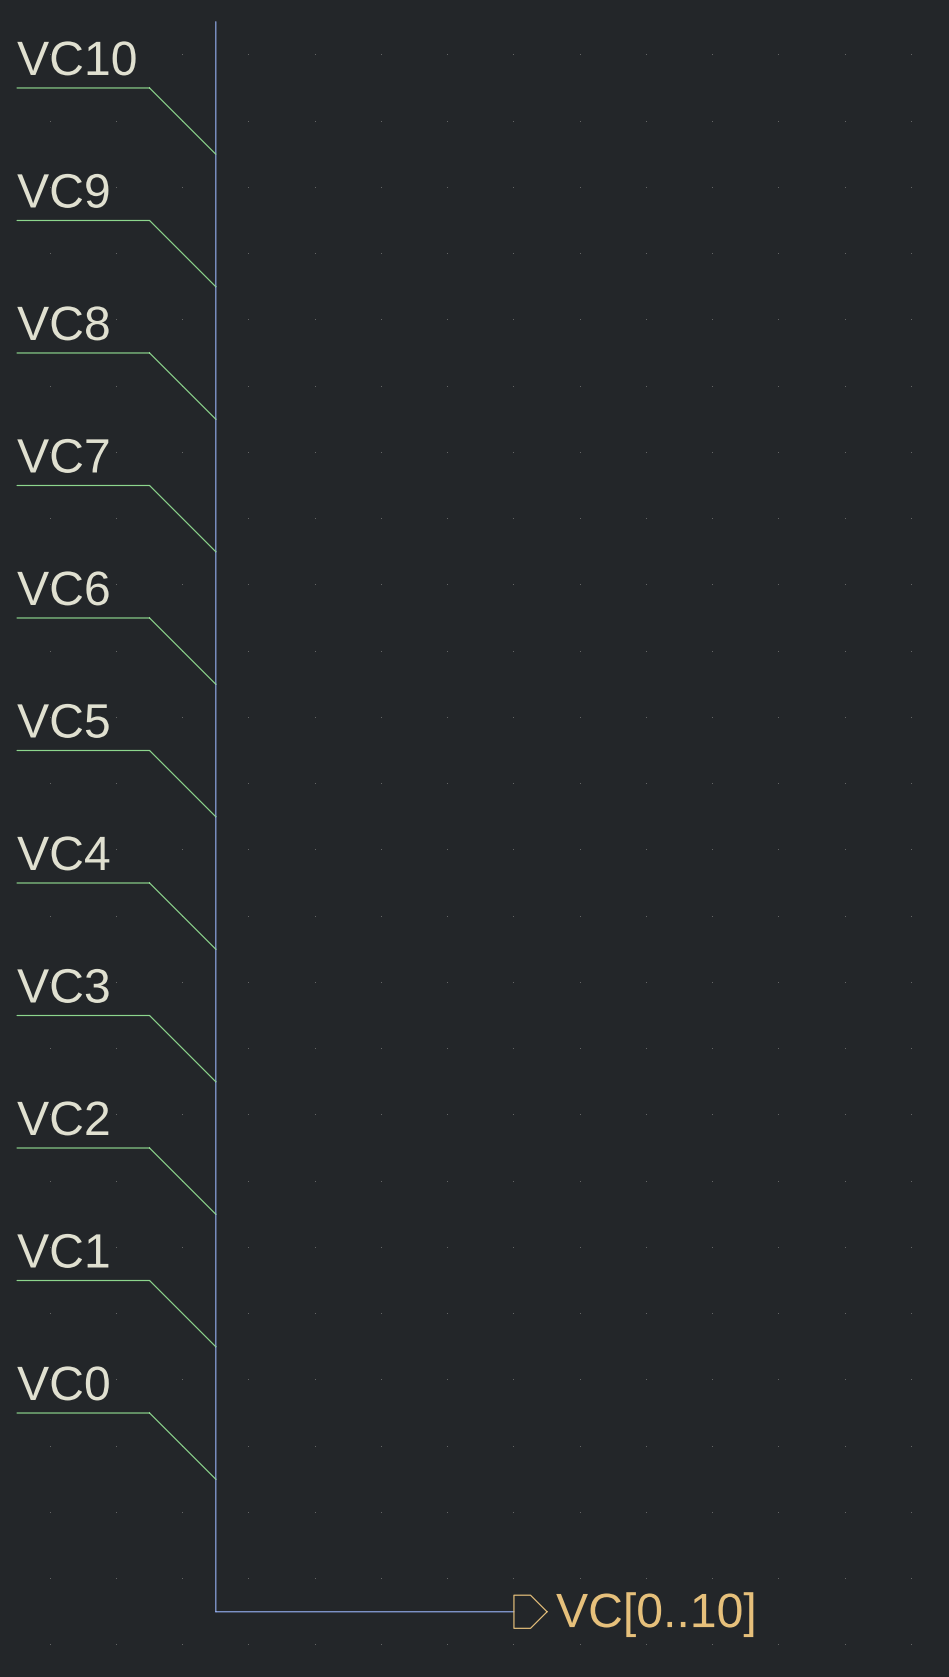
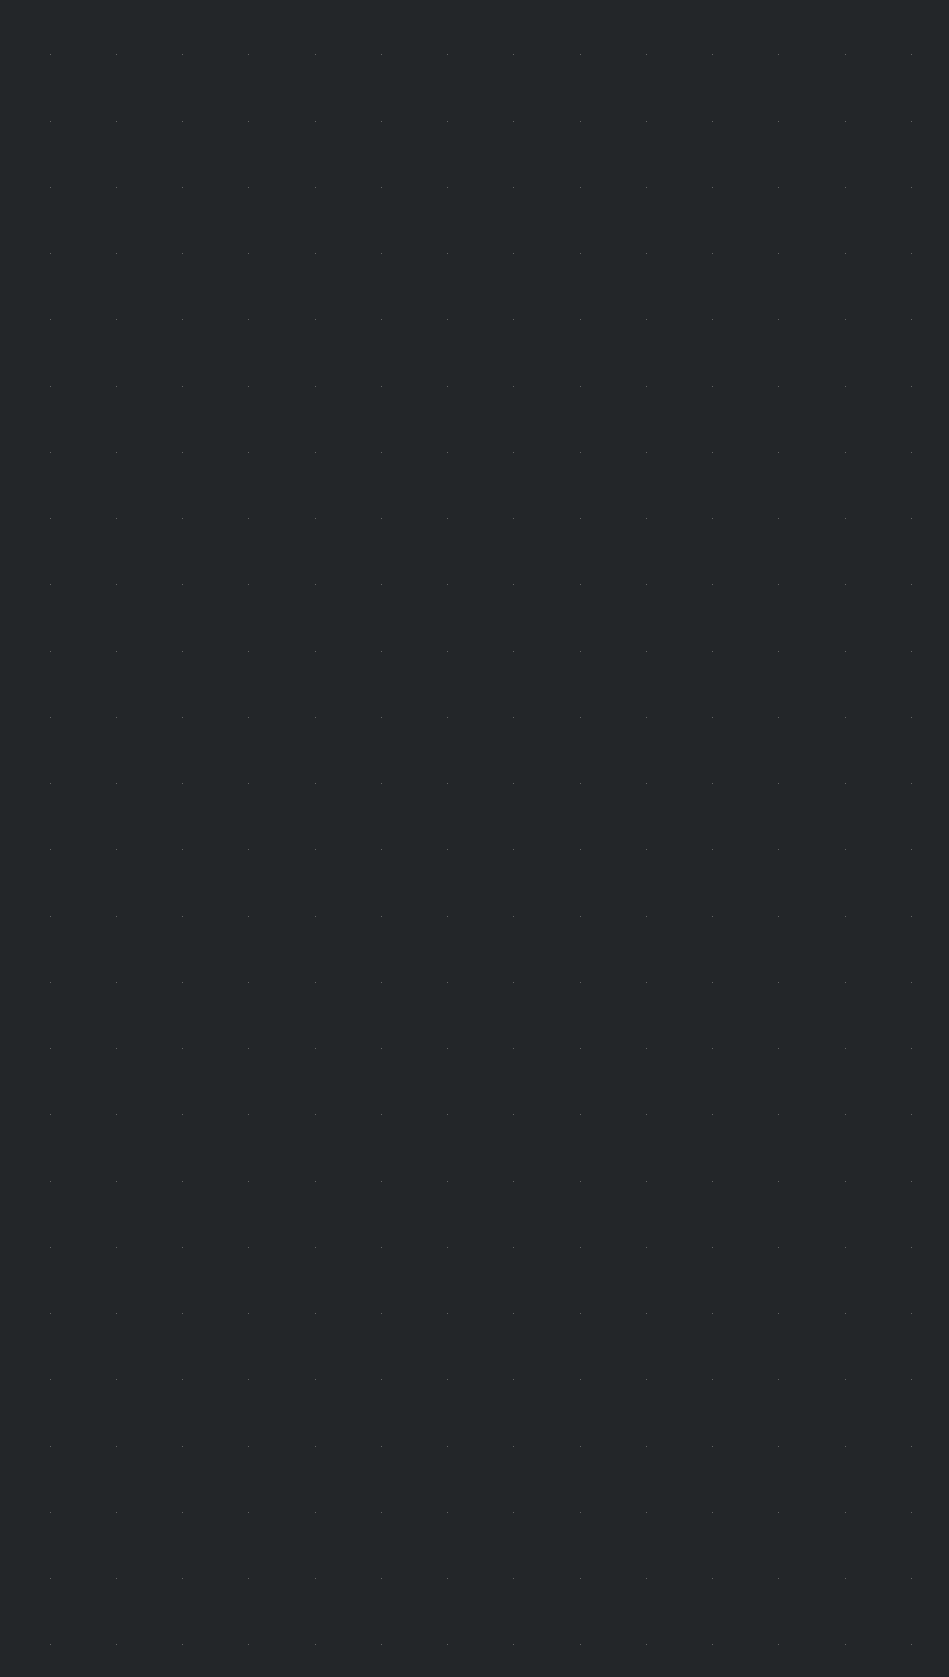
bus: (215, 21) (215, 1611) (513, 1611) -> none
label: VC10 (76, 58) -> none
wire: (17, 87) (149, 87) (215, 154) -> none
label: VC9 (62, 190) -> none
wire: (17, 220) (149, 220) (215, 286) -> none
label: VC8 (62, 323) -> none
wire: (17, 352) (149, 352) (215, 419) -> none
label: VC7 (62, 455) -> none
wire: (17, 485) (149, 485) (215, 551) -> none
label: VC6 (62, 588) -> none
wire: (17, 617) (149, 617) (215, 684) -> none
label: VC5 (62, 720) -> none
wire: (17, 750) (149, 750) (215, 816) -> none
label: VC4 (63, 853) -> none
wire: (17, 882) (149, 882) (215, 949) -> none
label: VC3 (62, 985) -> none
wire: (17, 1015) (149, 1015) (215, 1081) -> none
label: VC2 (62, 1118) -> none
wire: (17, 1148) (149, 1148) (215, 1214) -> none
label: VC1 (62, 1250) -> none
wire: (17, 1280) (149, 1280) (215, 1346) -> none
label: VC0 (63, 1383) -> none
wire: (17, 1413) (149, 1413) (215, 1479) -> none
hierarchical label: VC[0..10] (654, 1614) -> none

